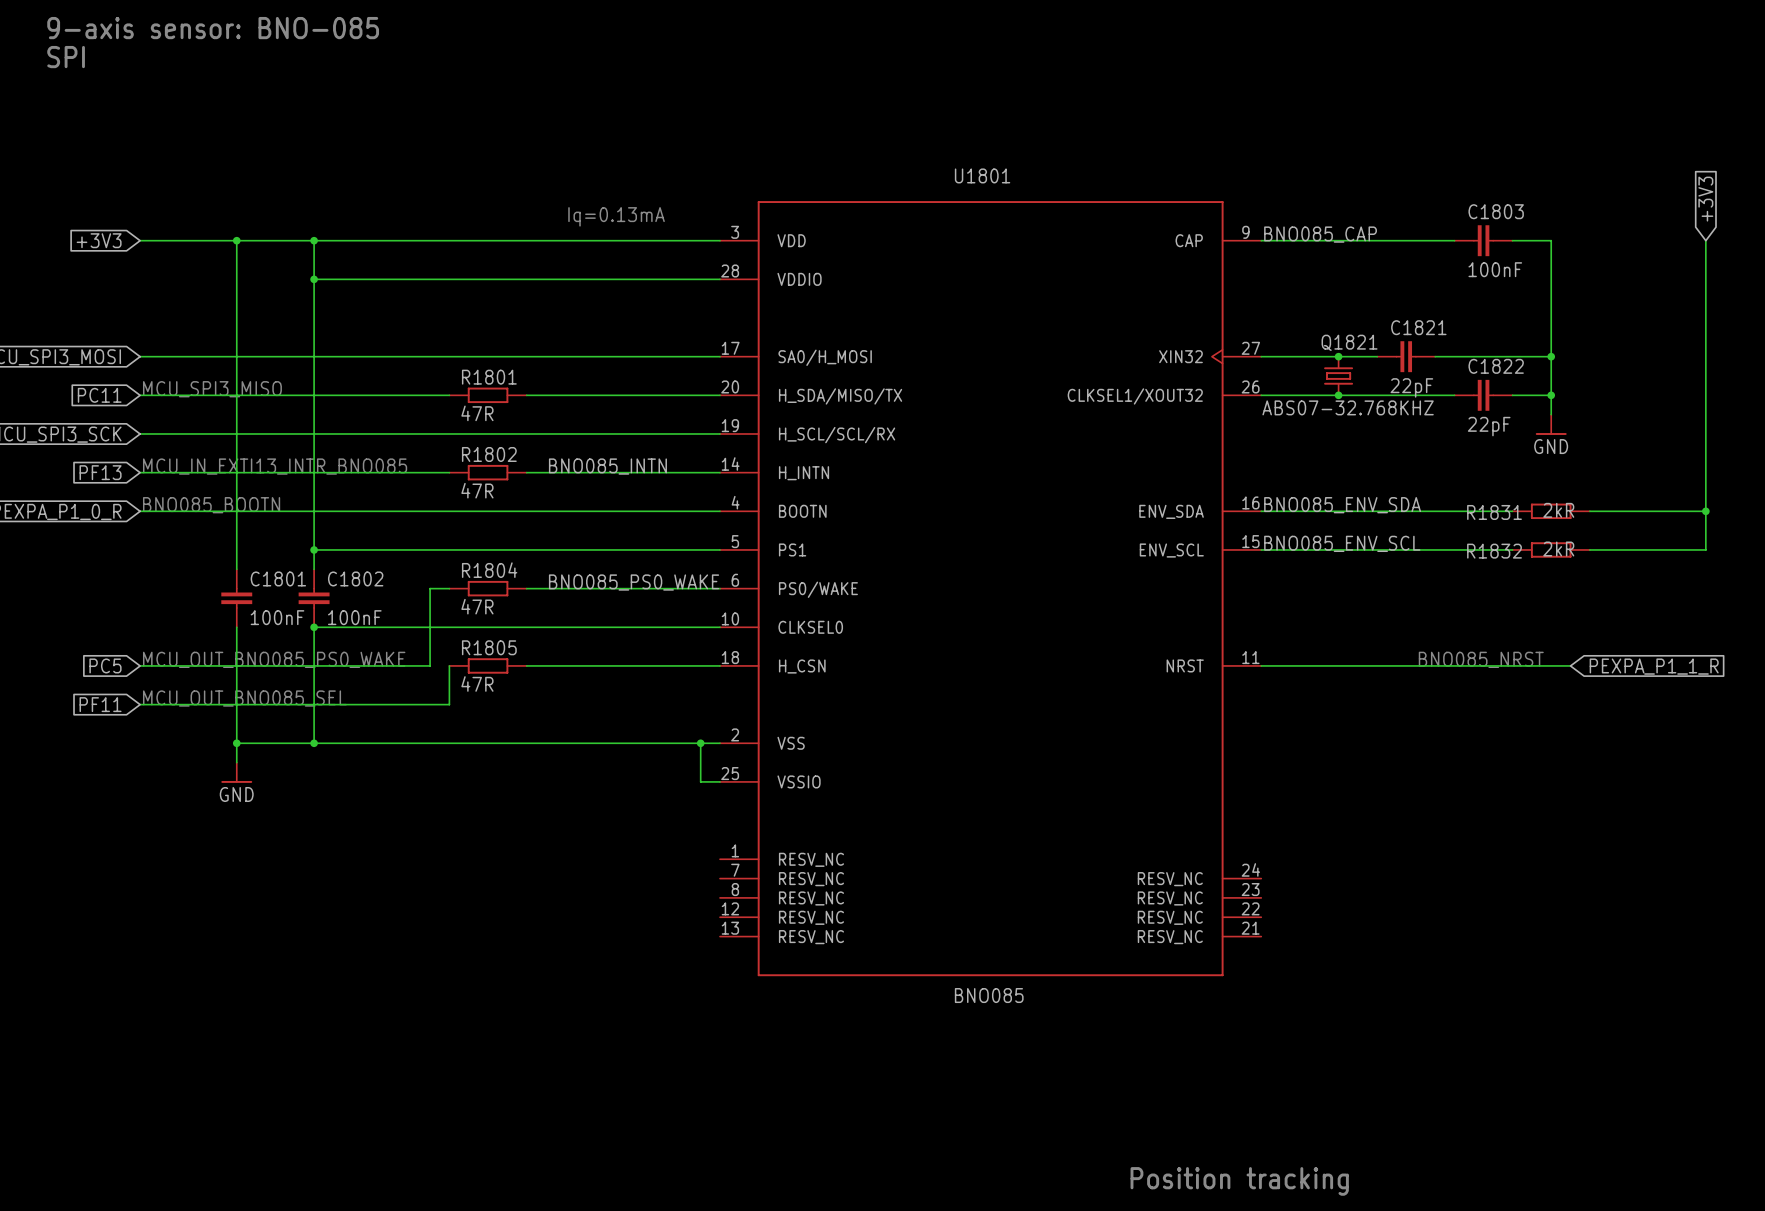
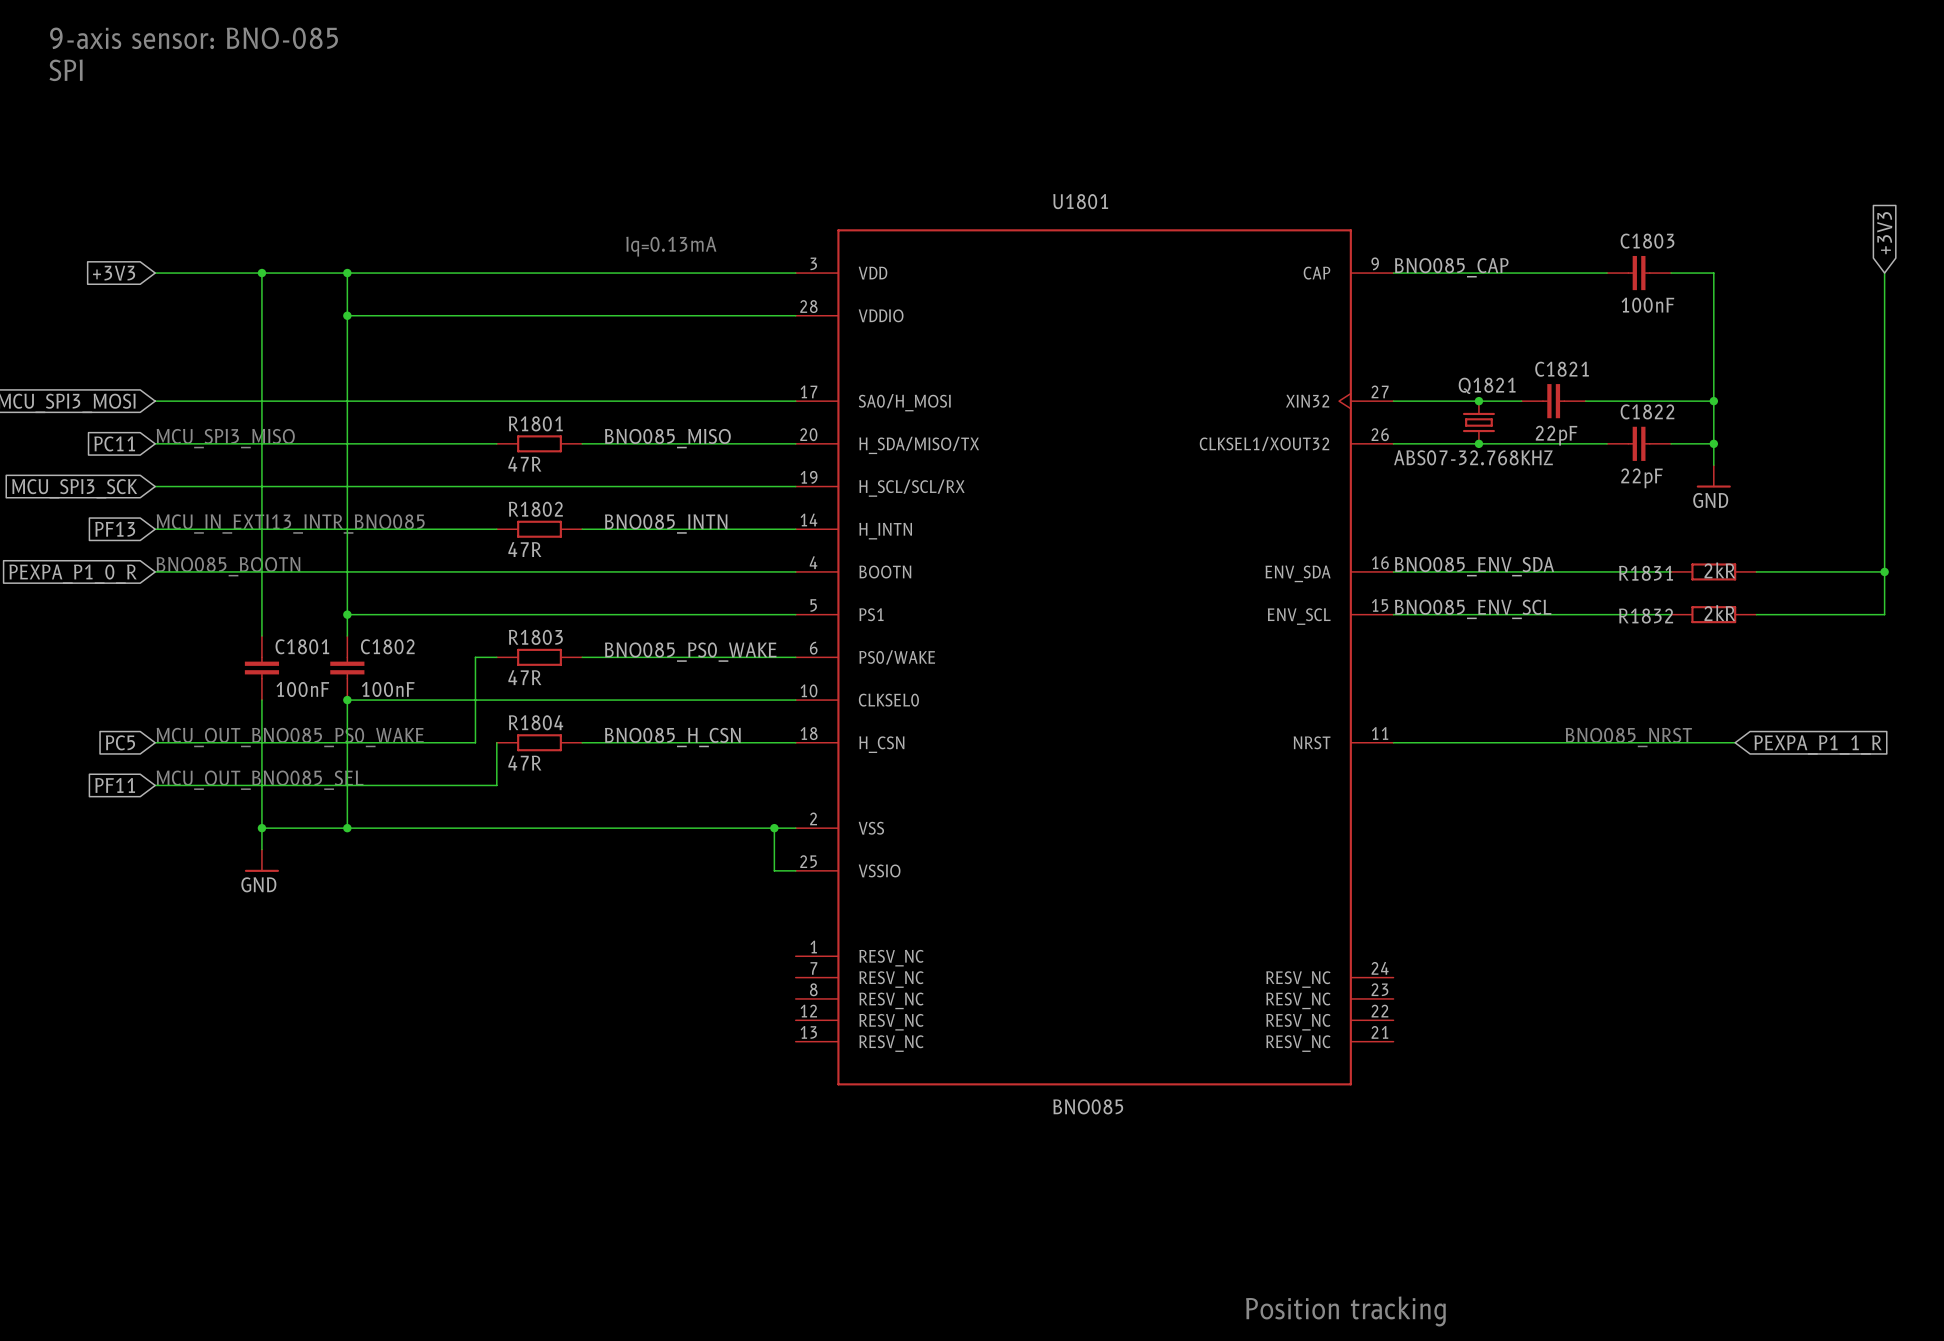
label: none -> BNO085_MISO (667, 438)
R1804 name: R1804 (489, 570) -> R1803 (535, 637)
R1805 name: R1805 (489, 647) -> R1804 (536, 722)
label: none -> BNO085_H_CSN (672, 737)

